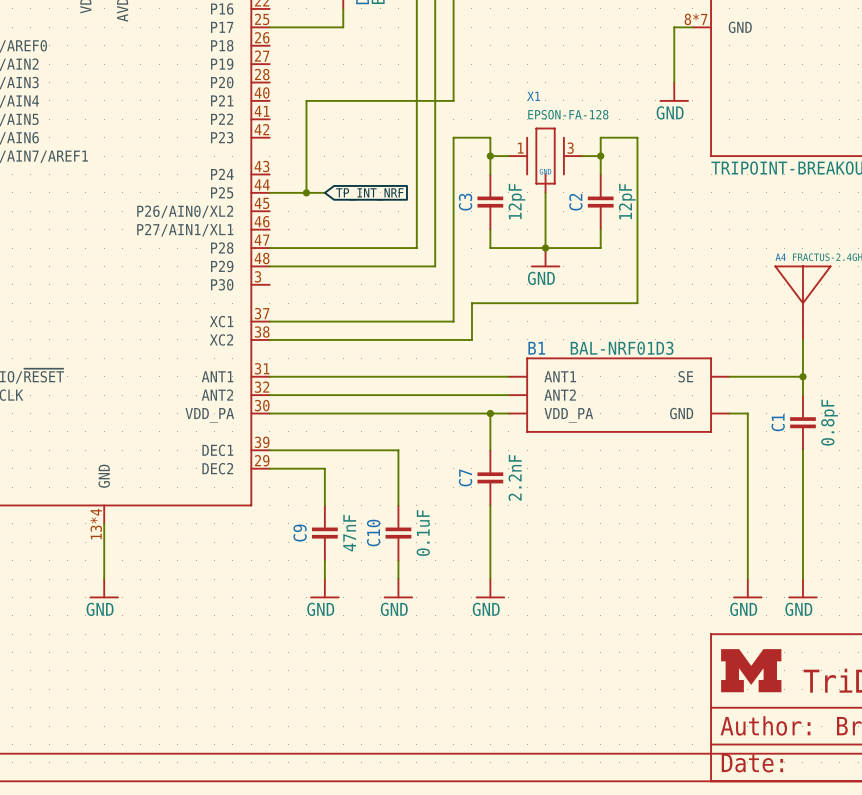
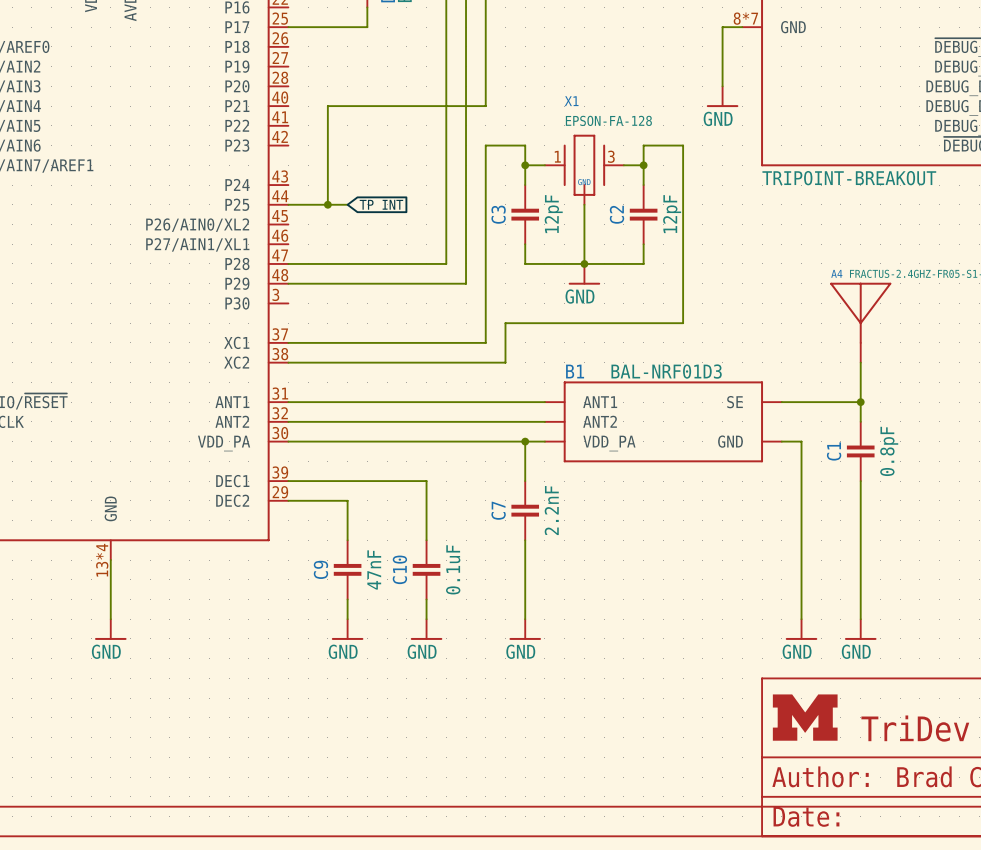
global label: TP_INT_NRF (369, 194) -> TP_INT (381, 206)

